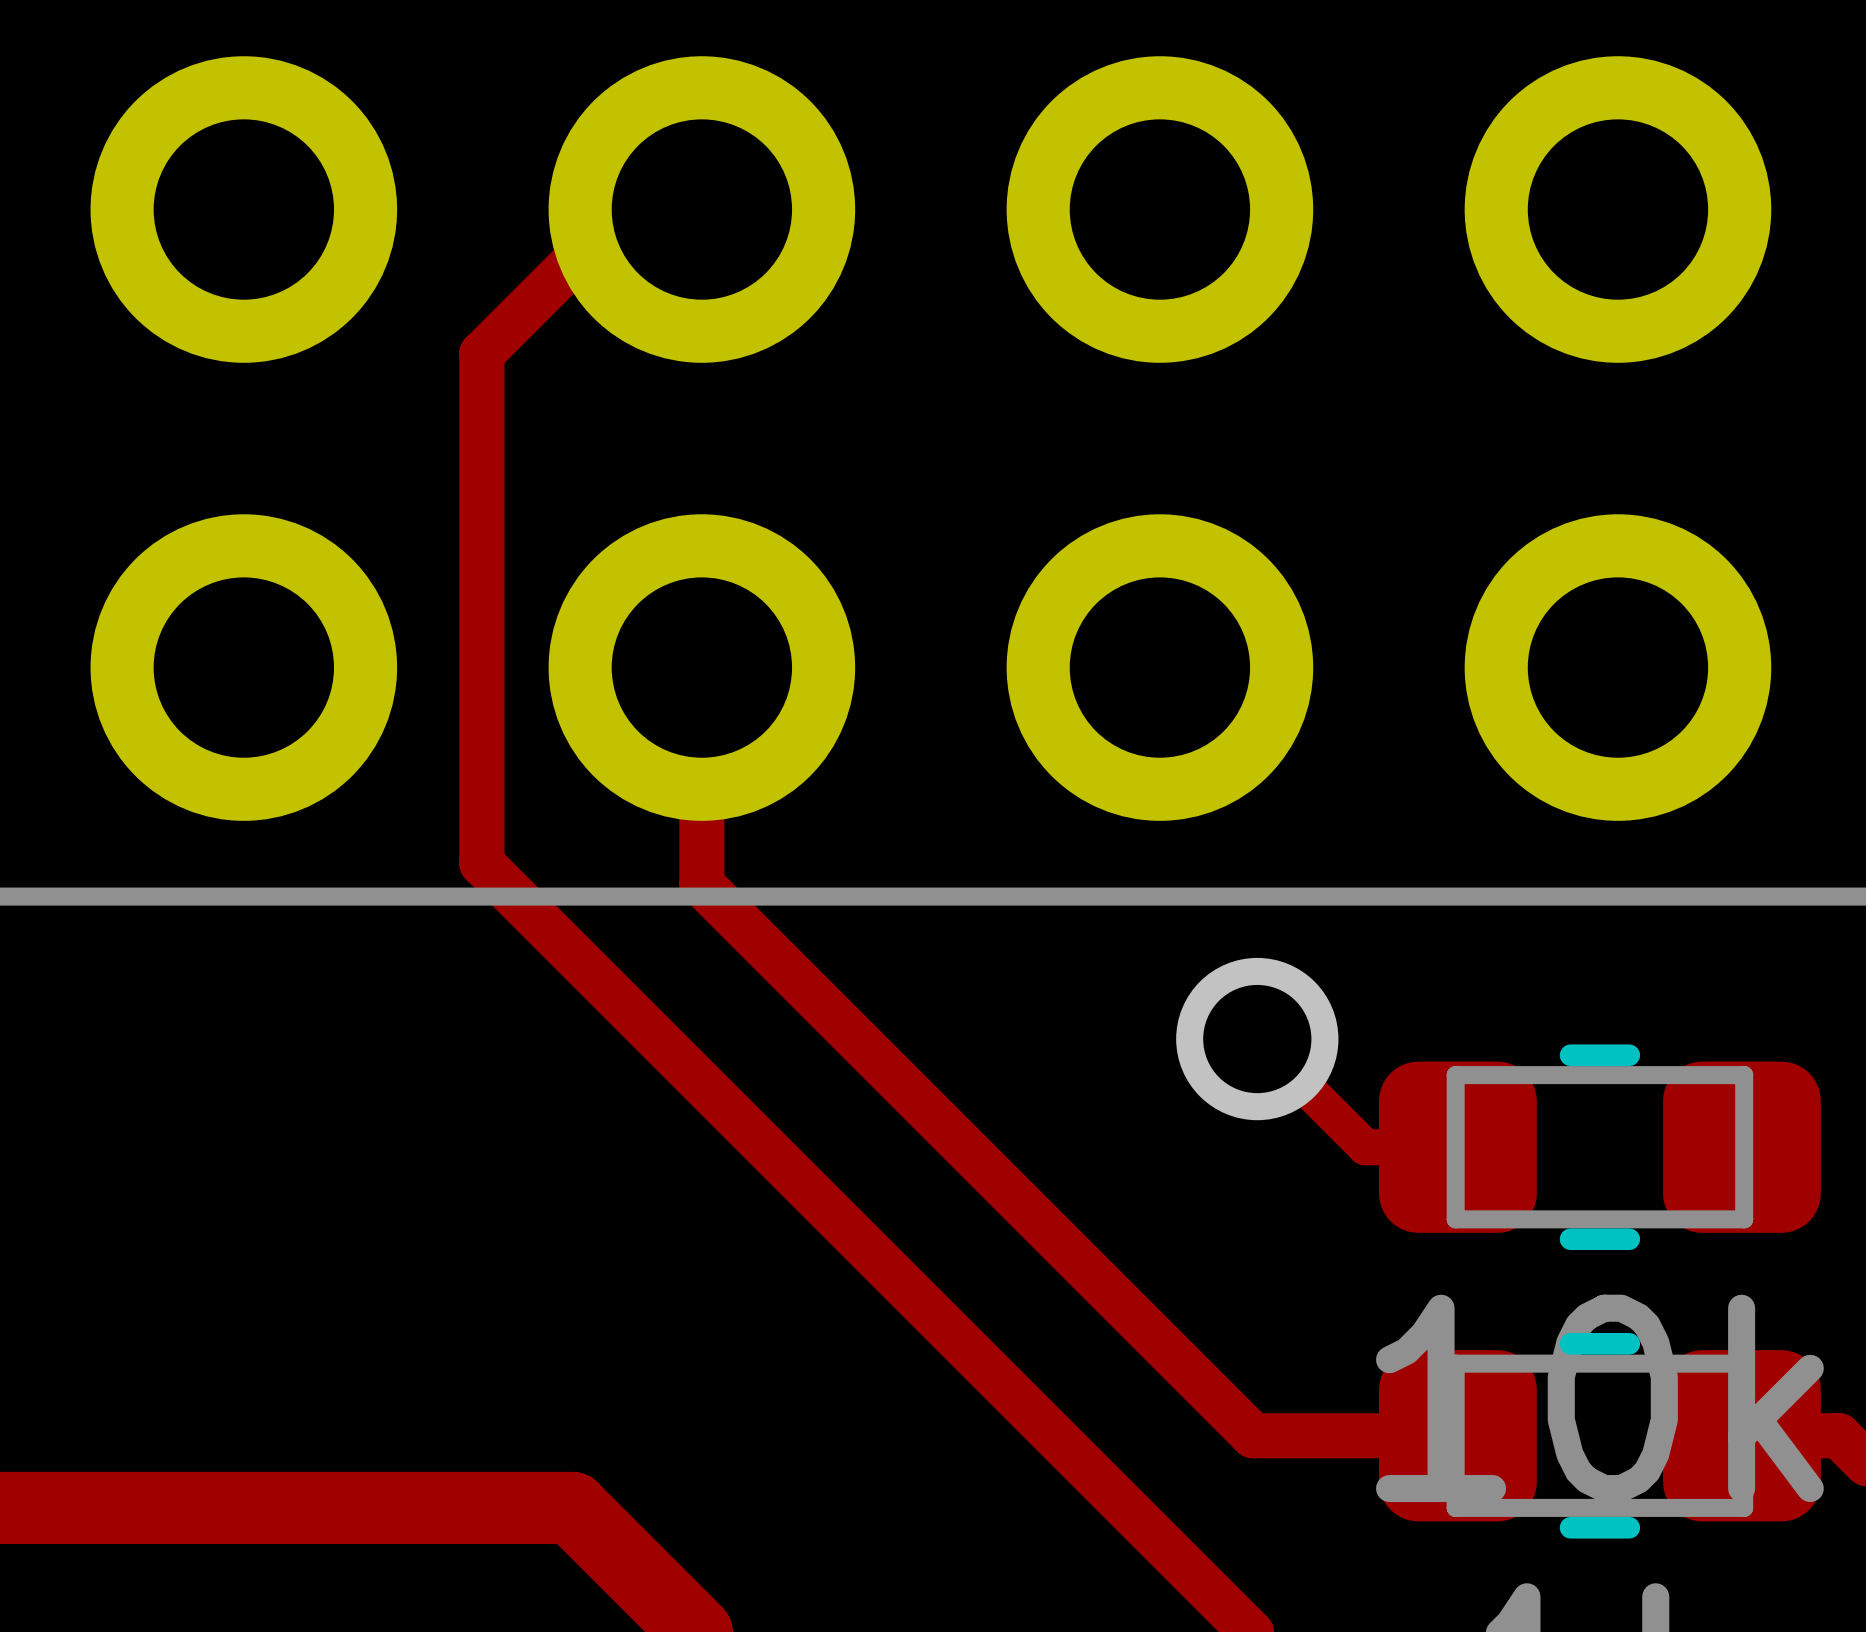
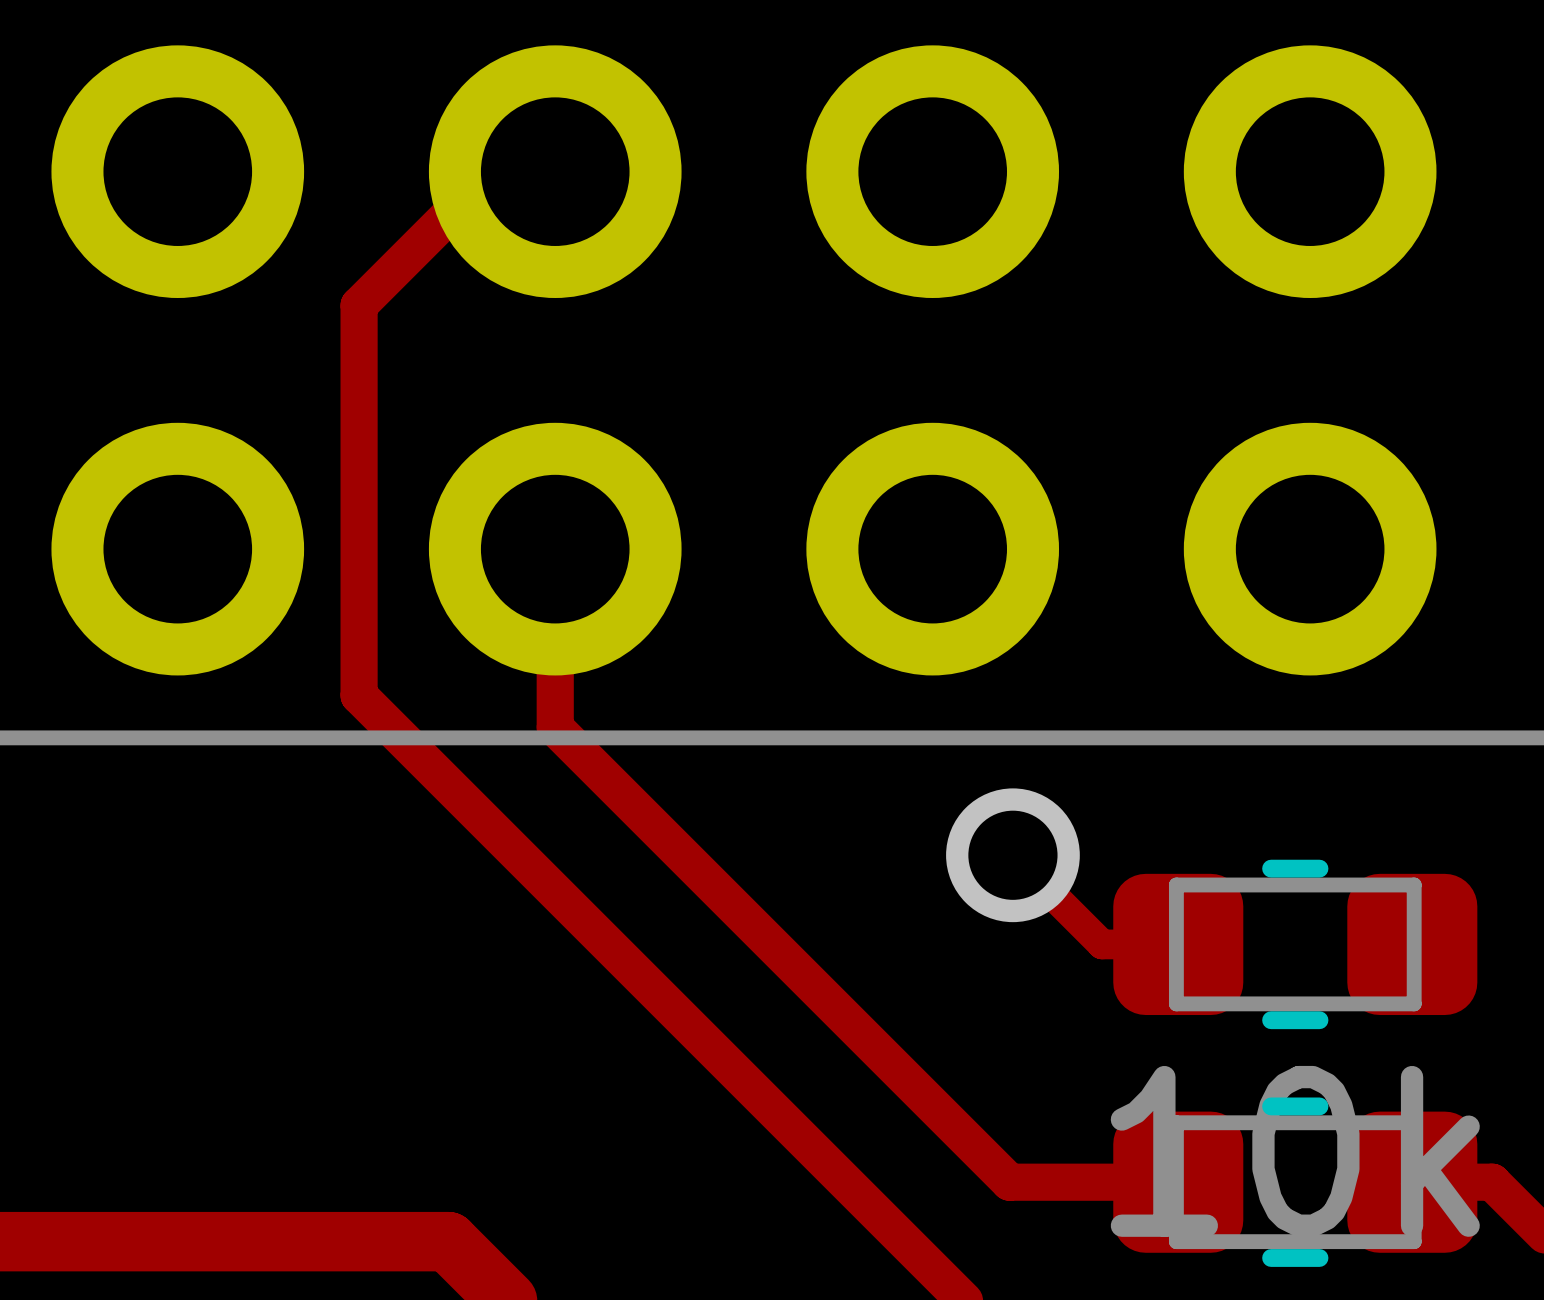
track: (481, 353) (481, 863) -> (373, 290) (359, 305) (359, 695) (373, 710)

